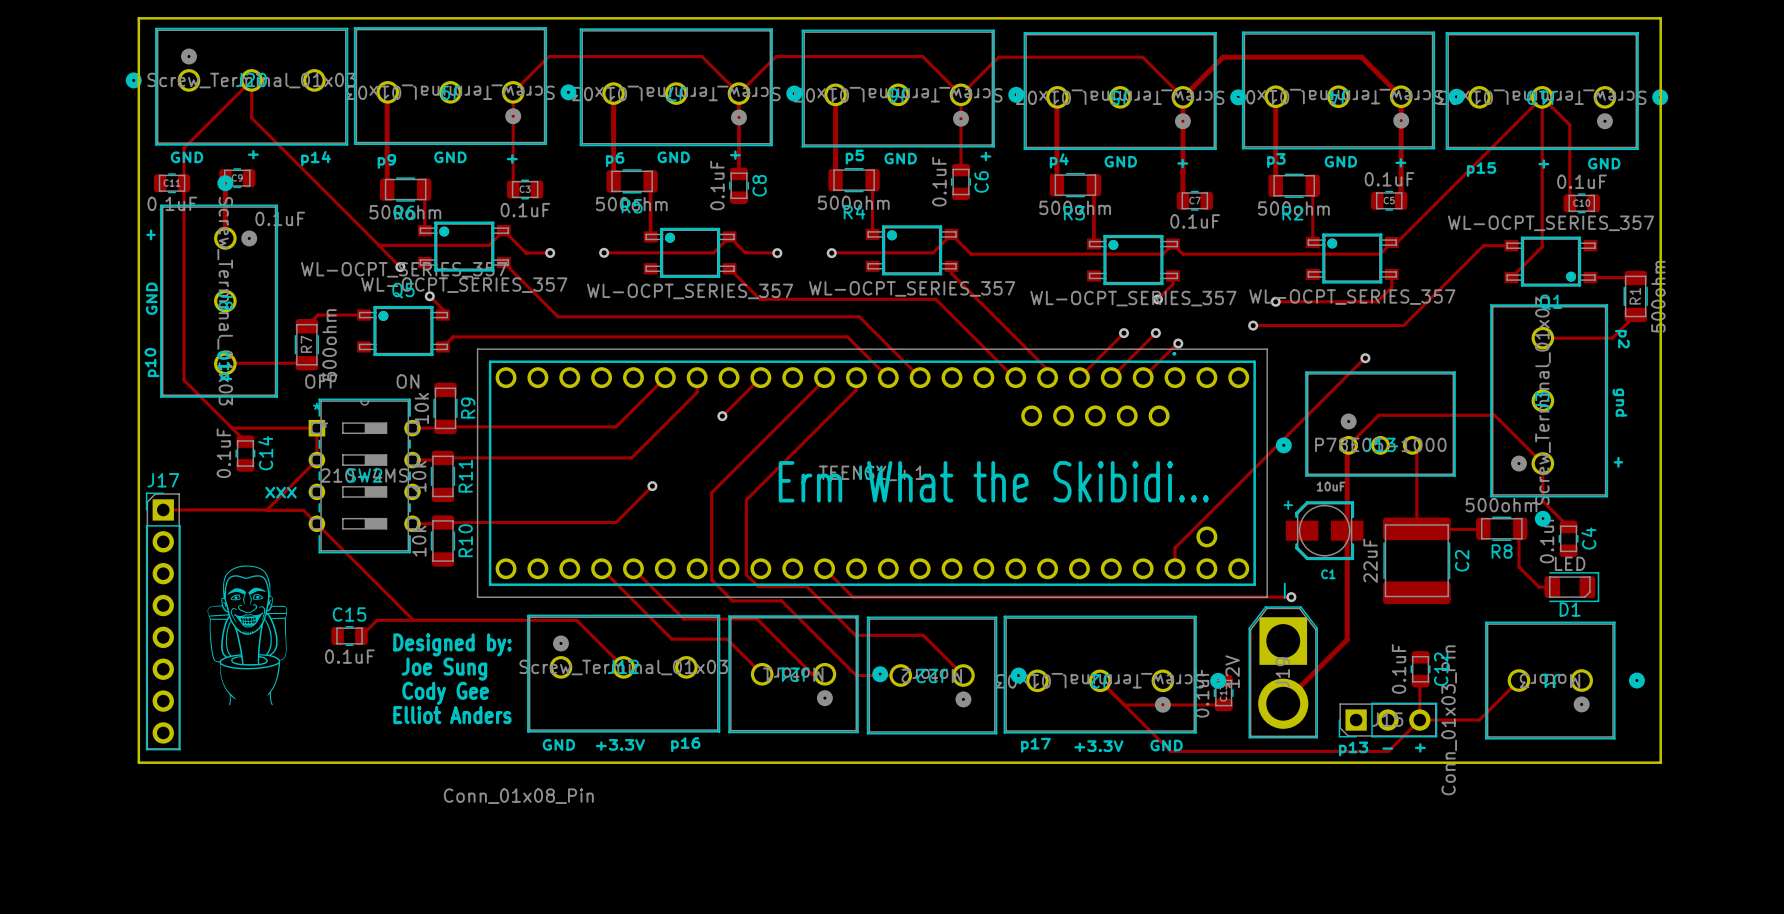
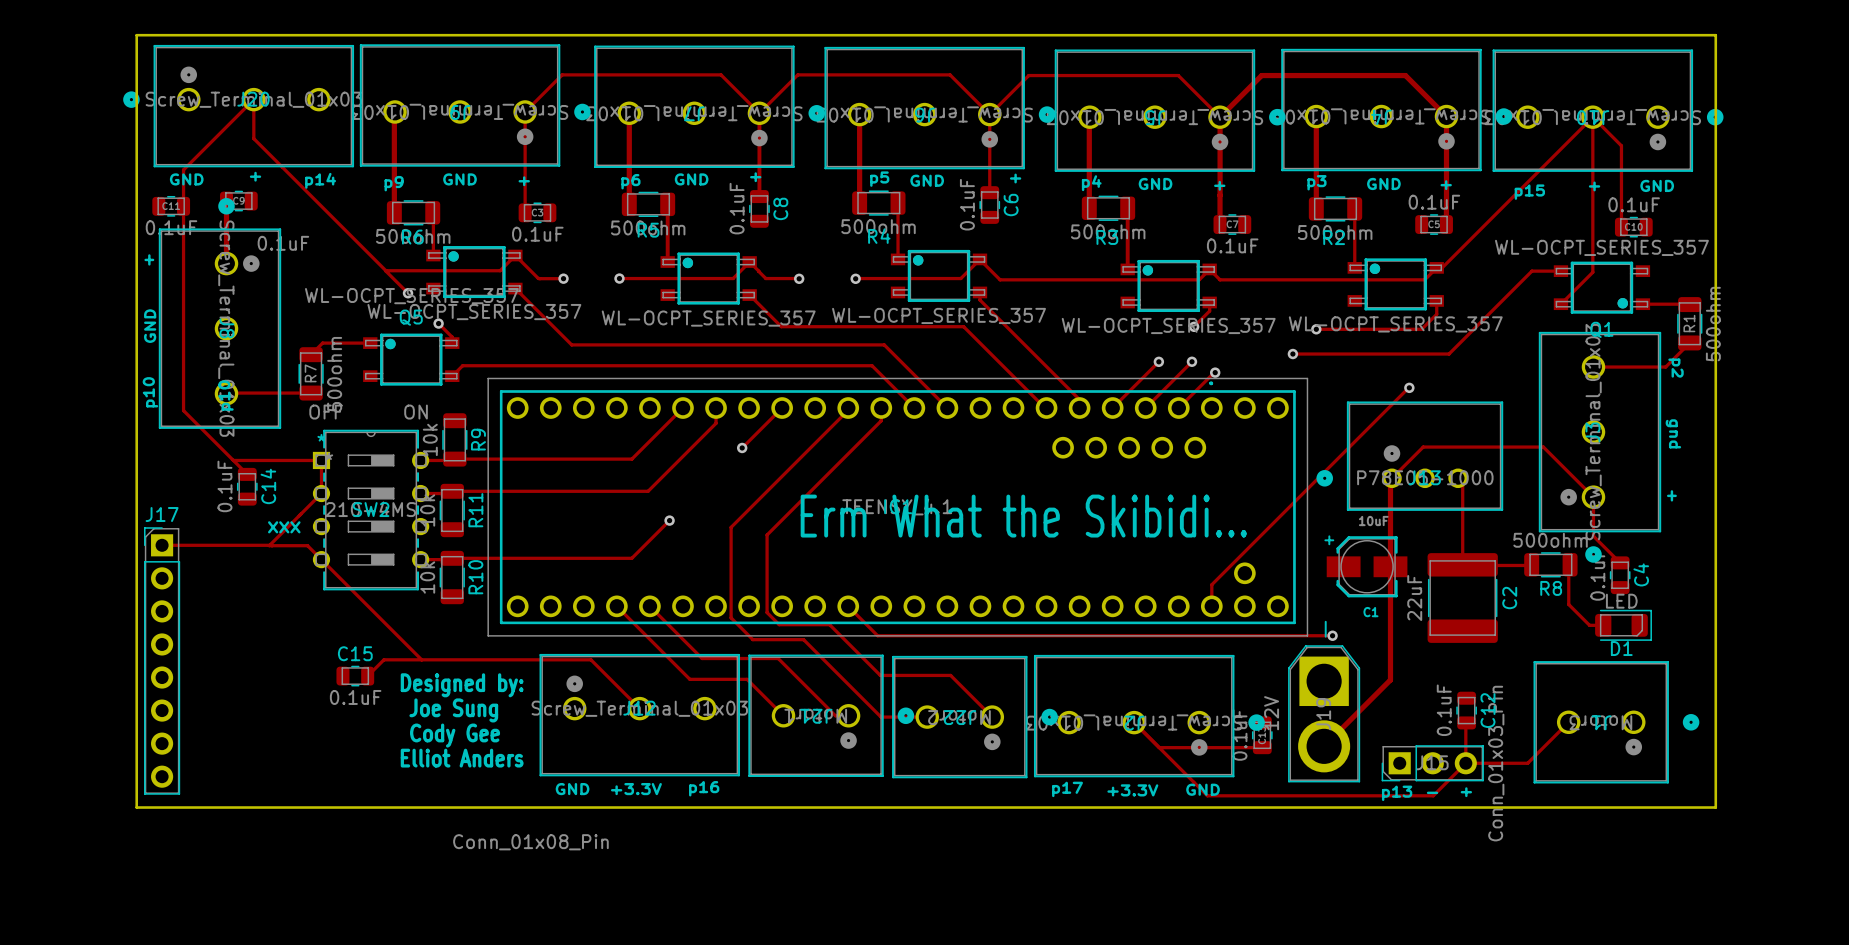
drawing: [207, 565, 288, 706] -> none

